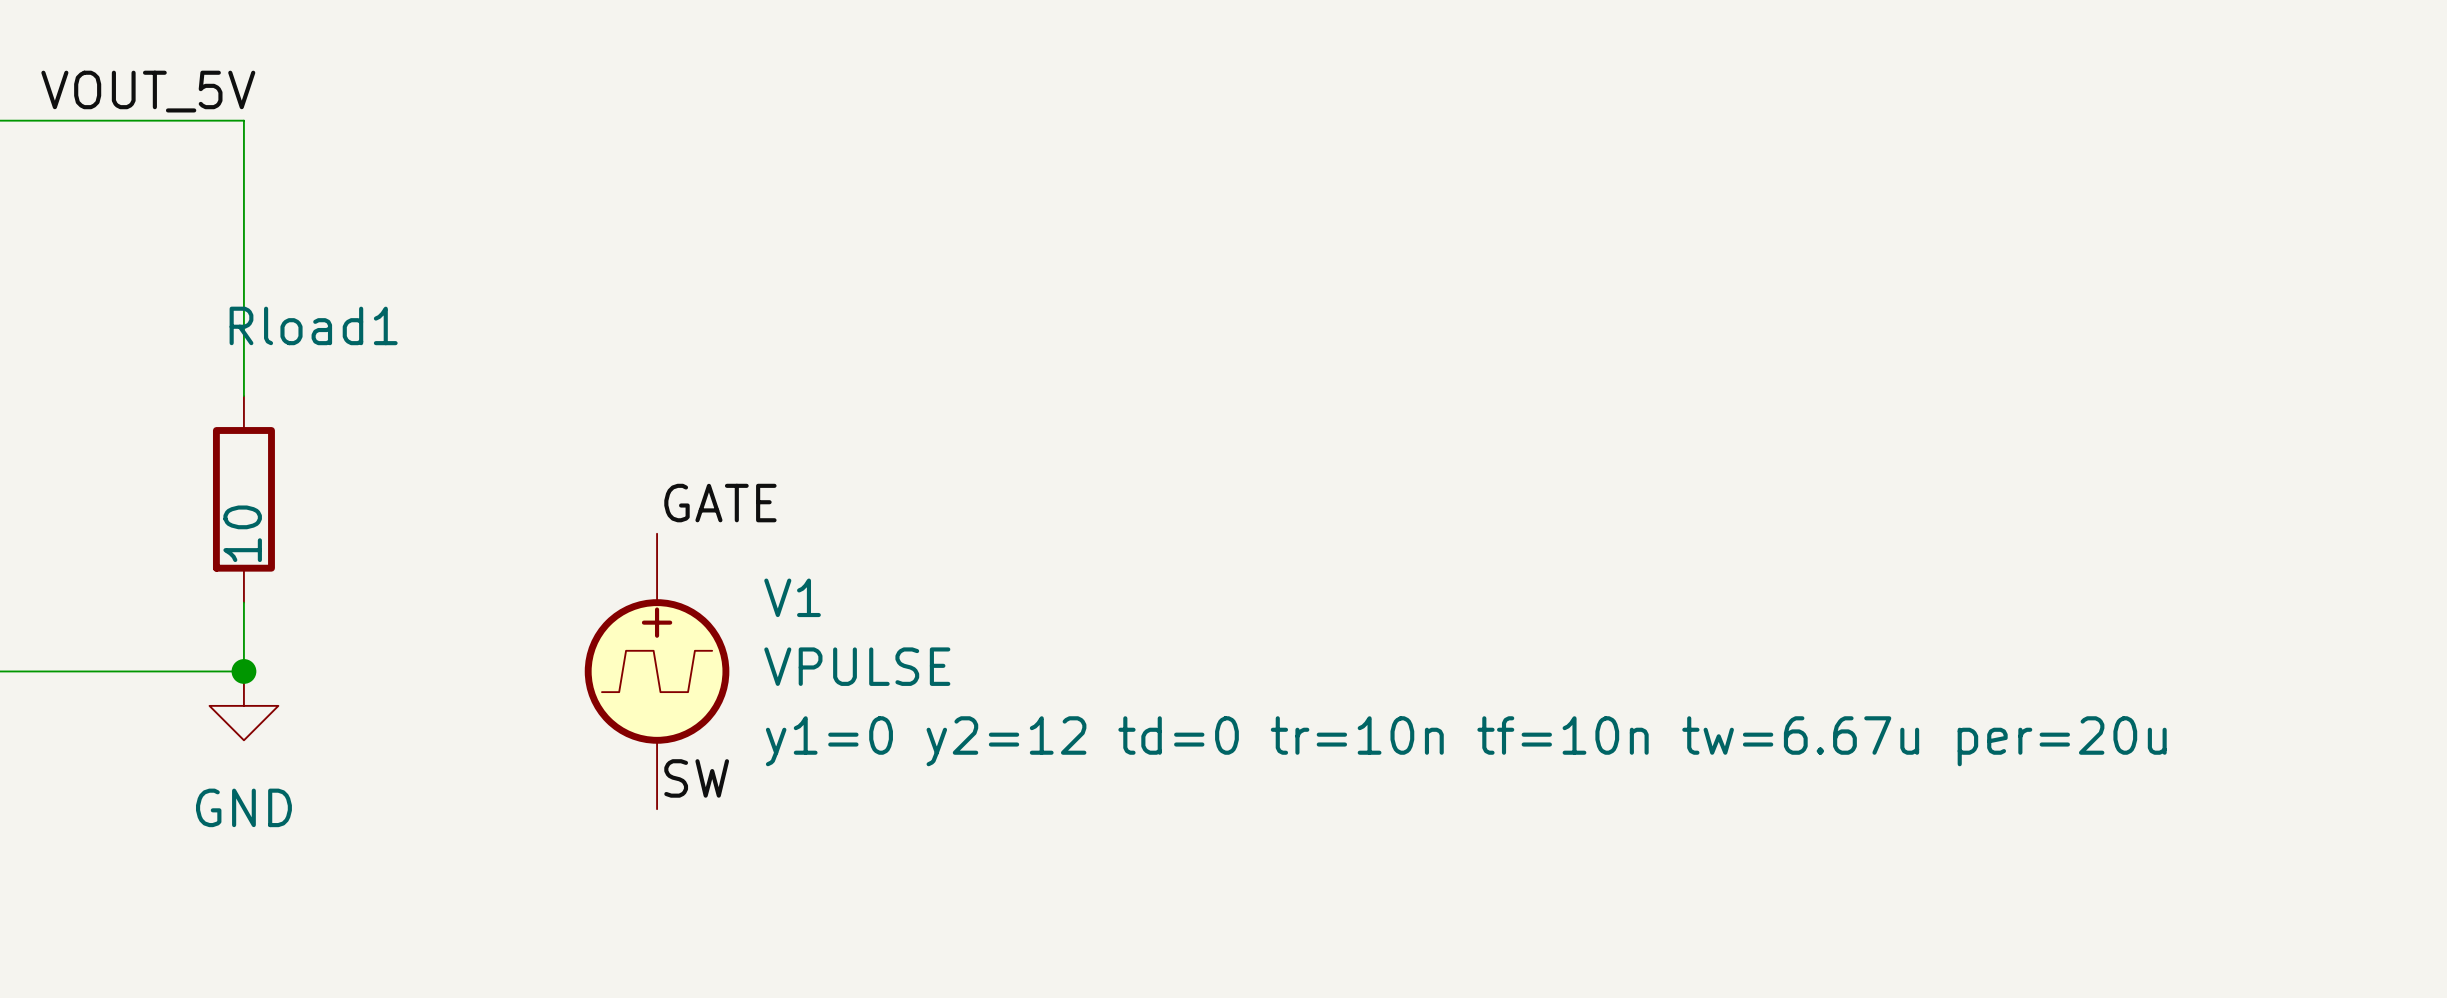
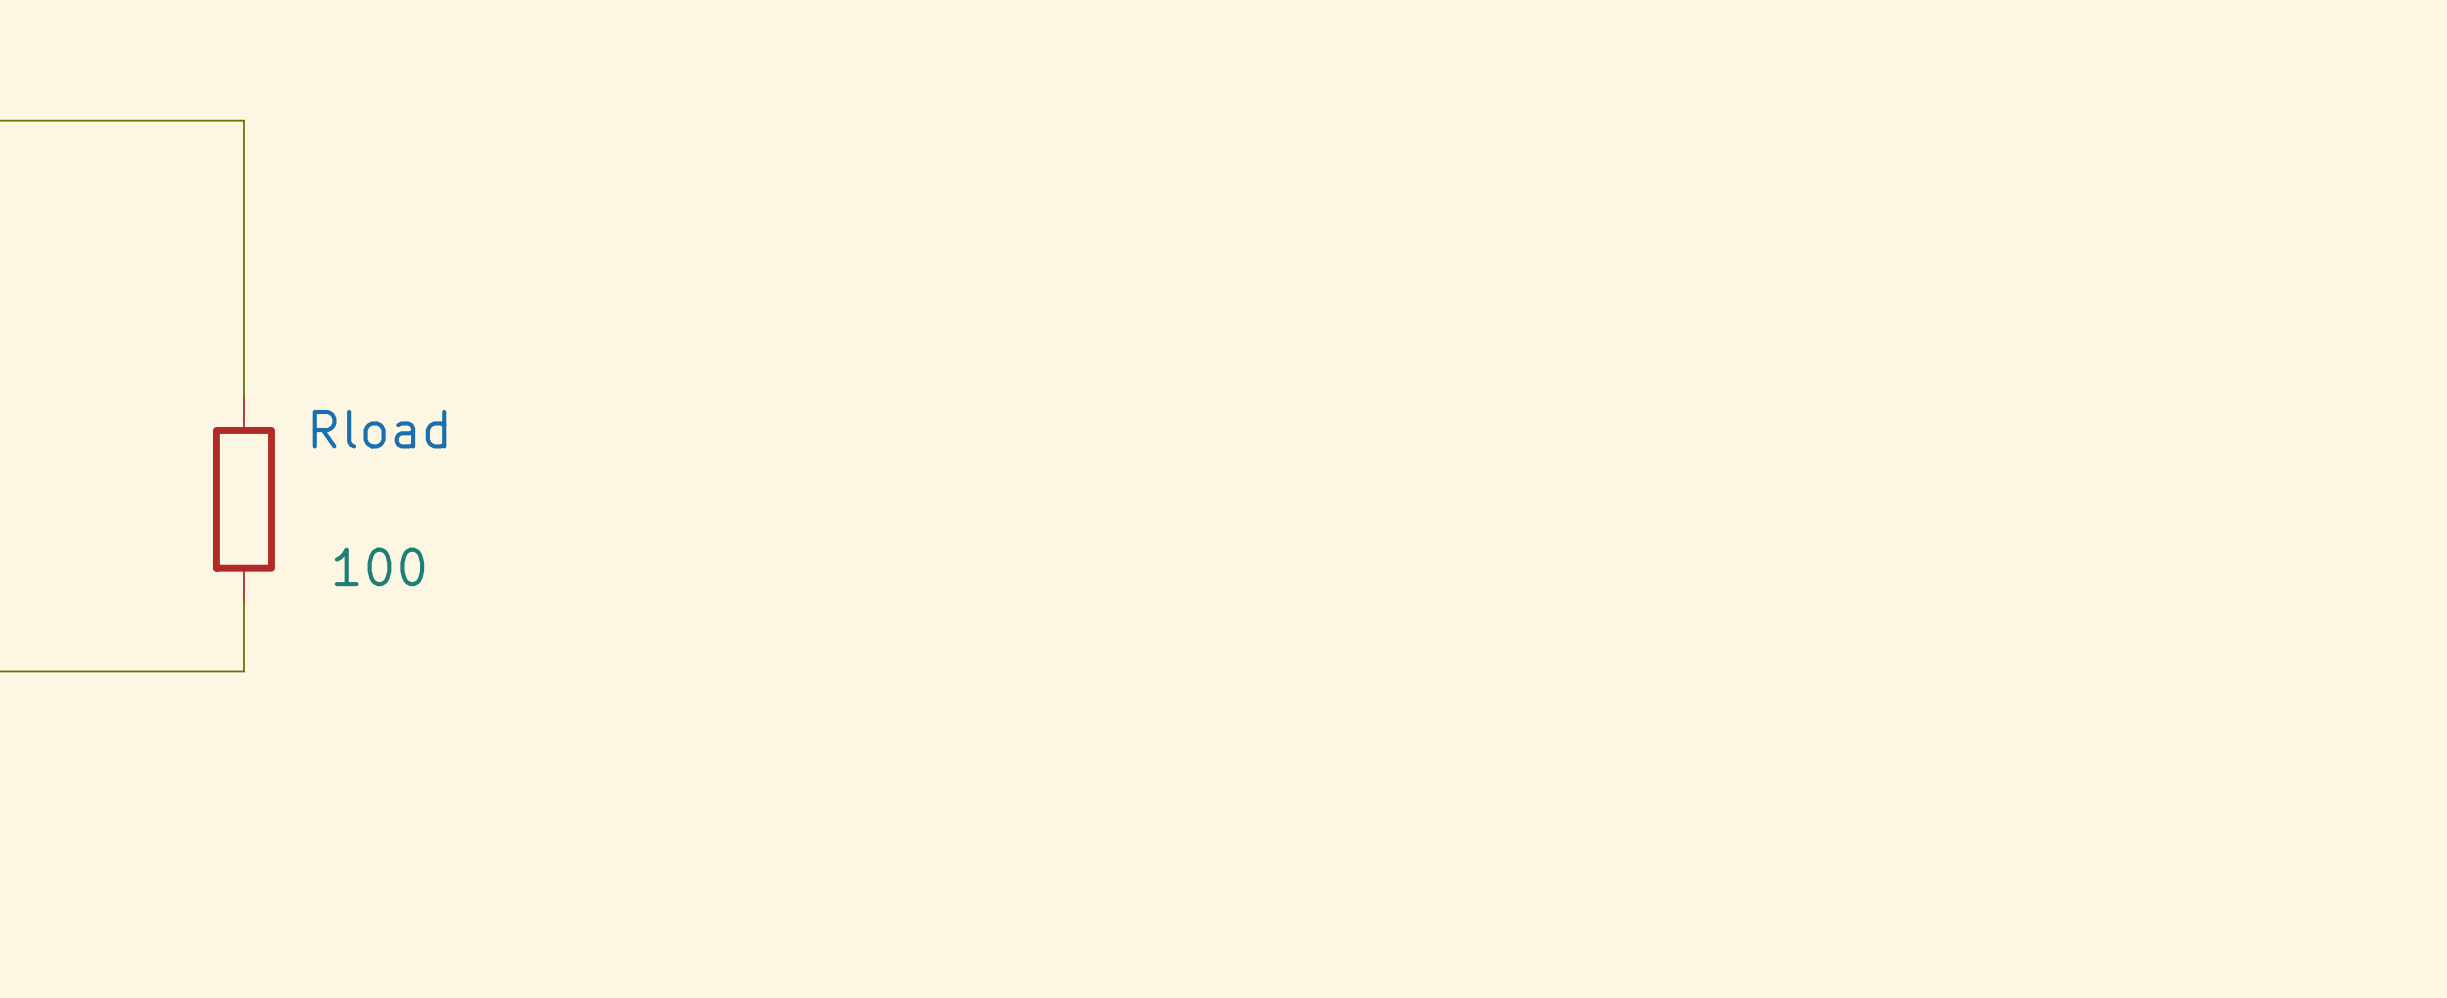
label: VOUT_5V (148, 91) -> none
Rload1 name: Rload1 (313, 325) -> Rload (379, 429)
label: GATE (720, 503) -> none
Rload1 value: 10 (242, 533) -> 100 (379, 566)
junction: (243, 671) -> none
V1: VPULSE (657, 671) -> none
power symbol: GND (243, 705) -> none
label: SW (696, 778) -> none

